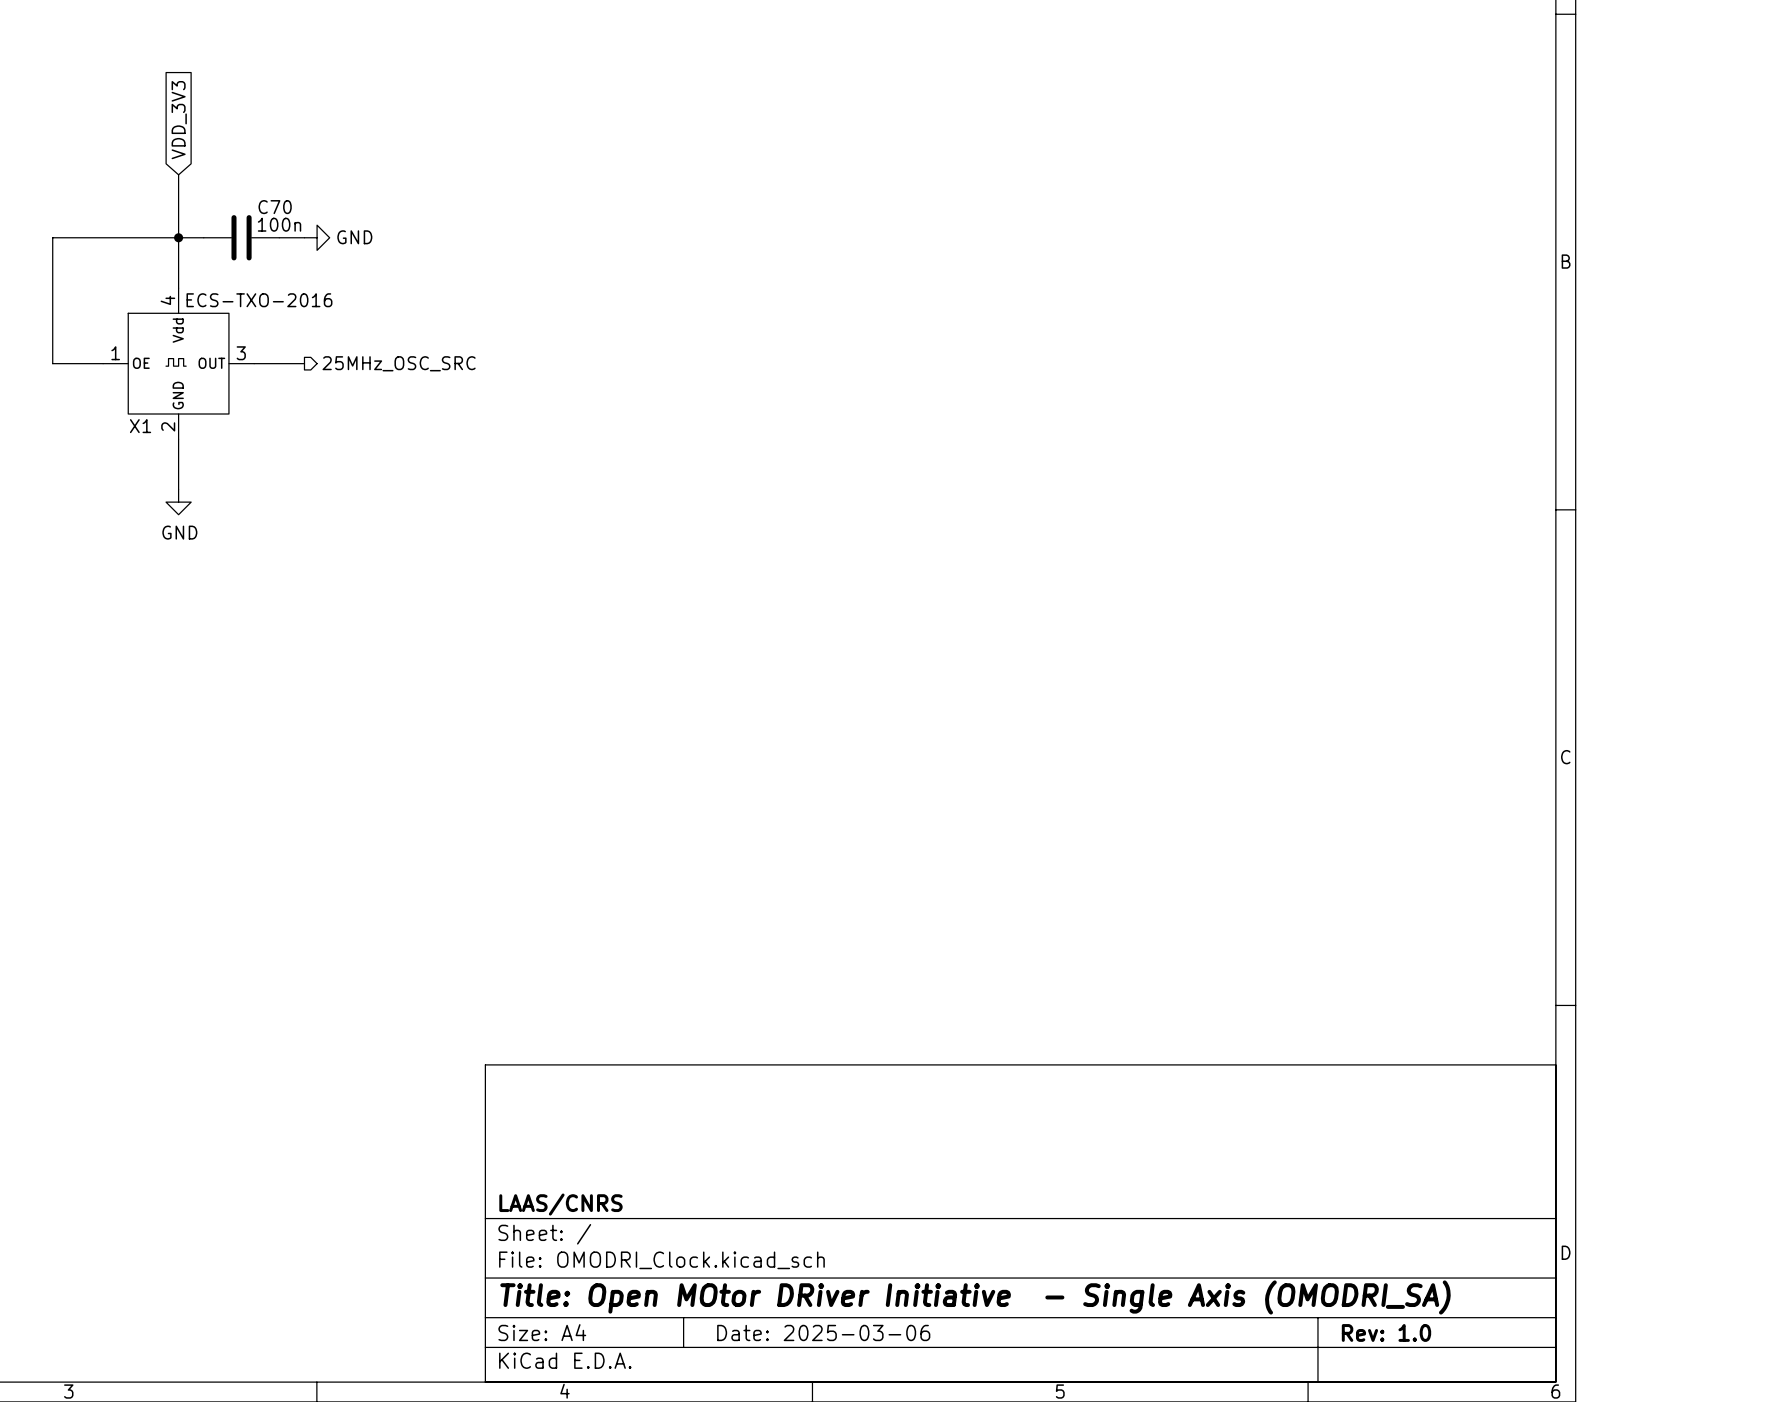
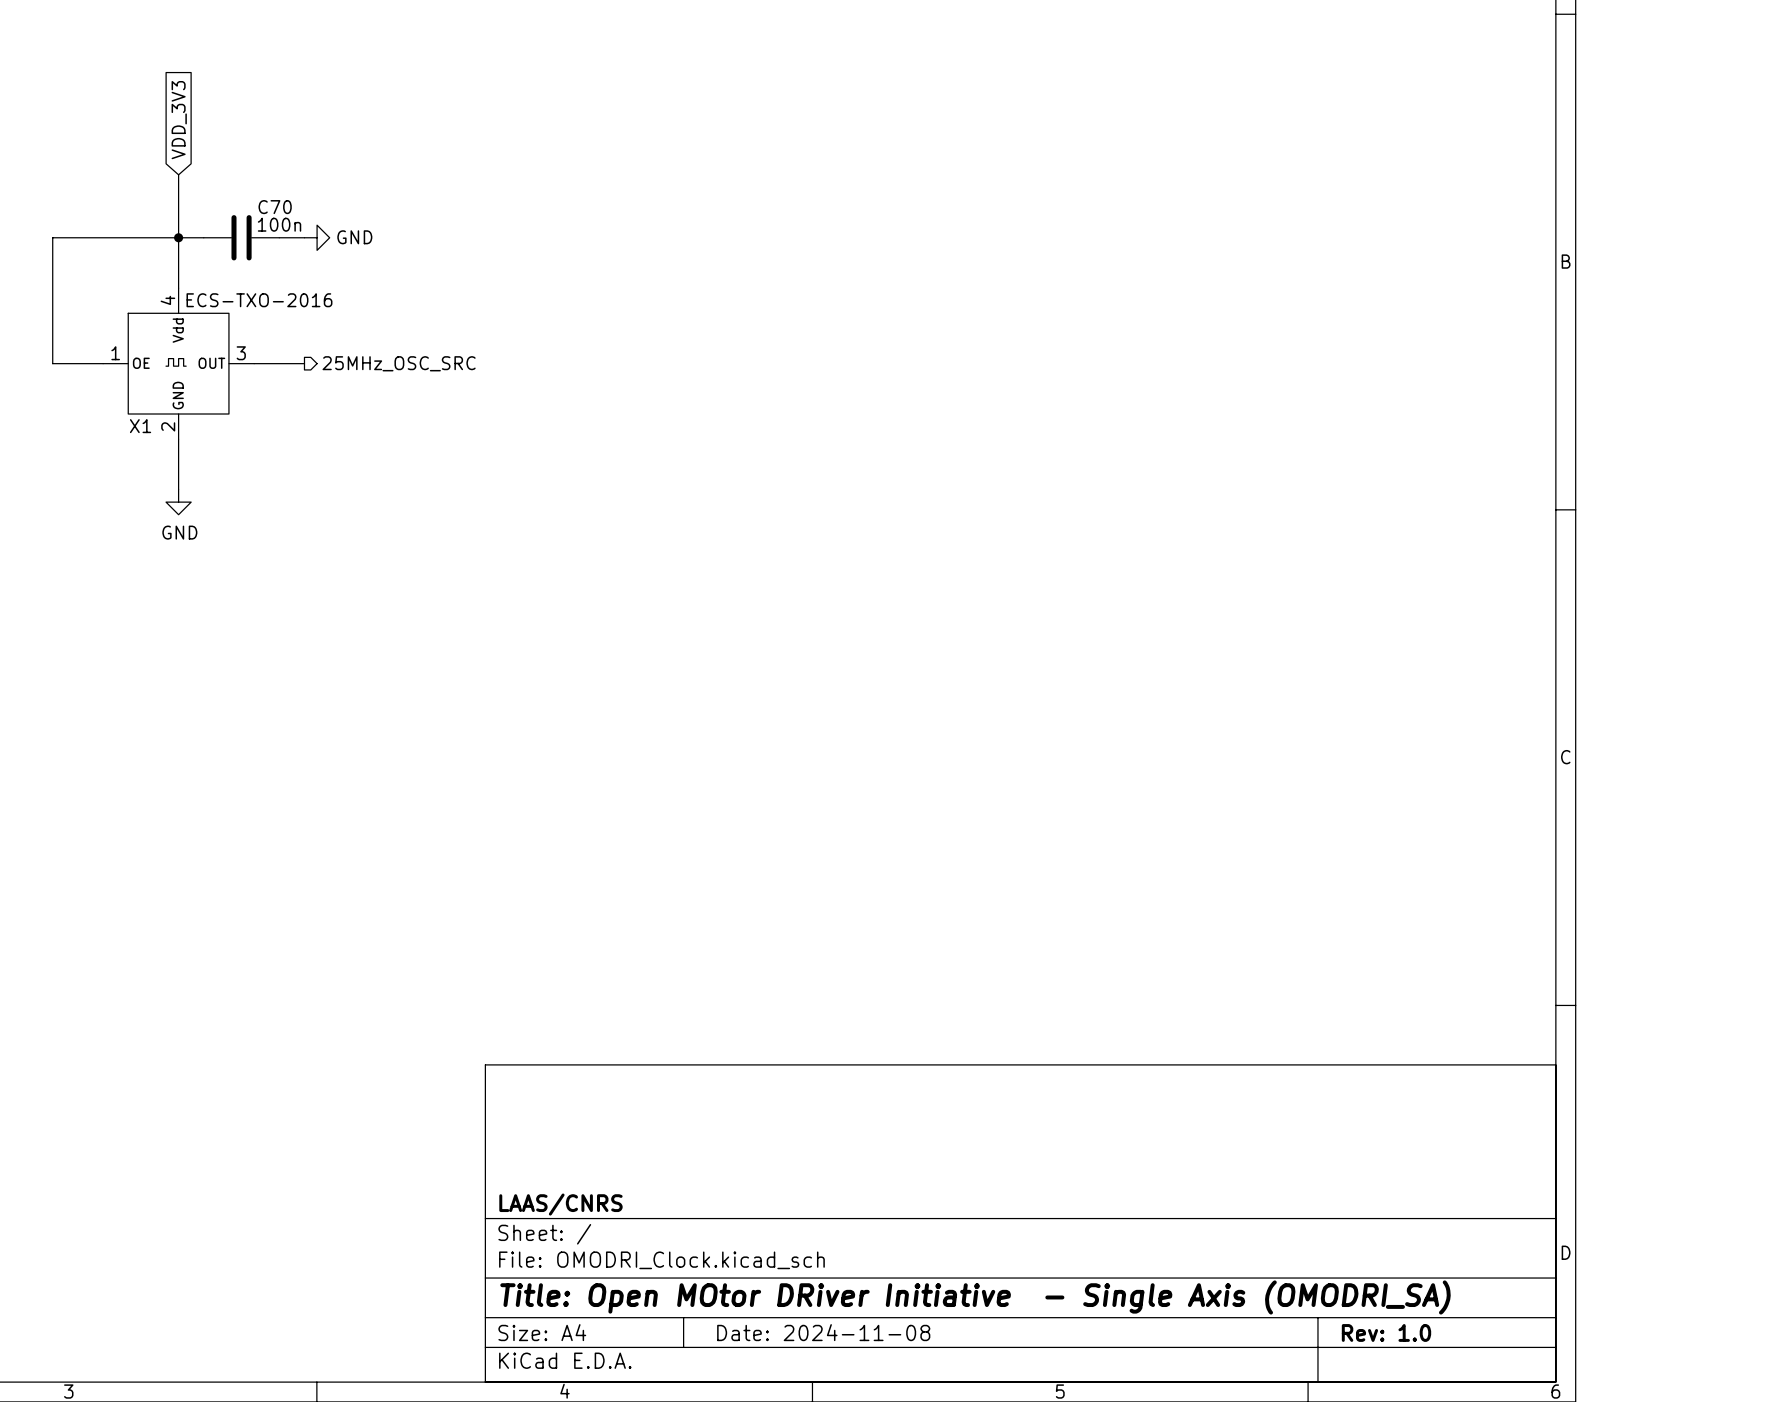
title block: Date: 2025-03-06 (823, 1332) -> Date: 2024-11-08 (823, 1332)

